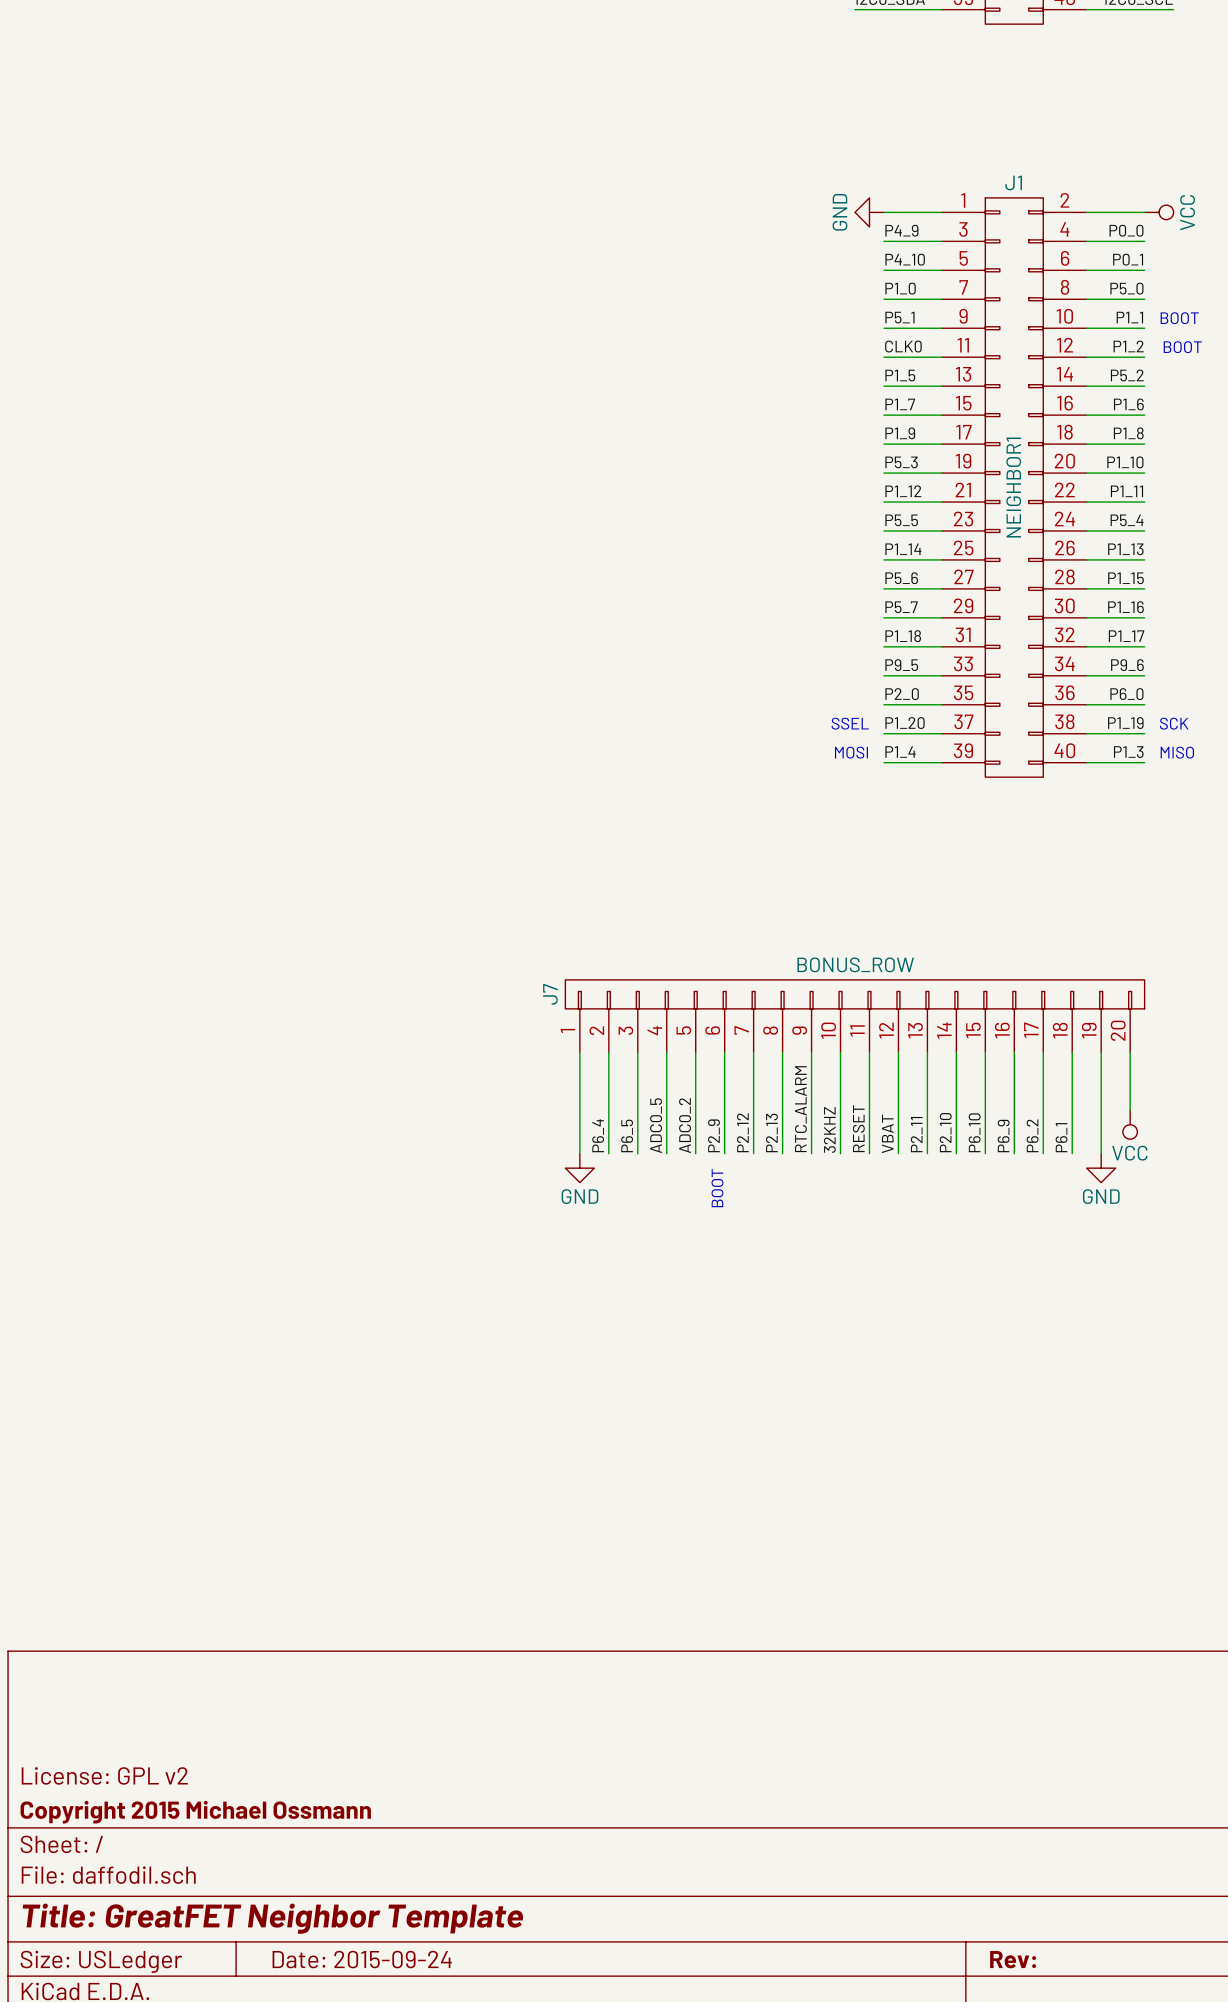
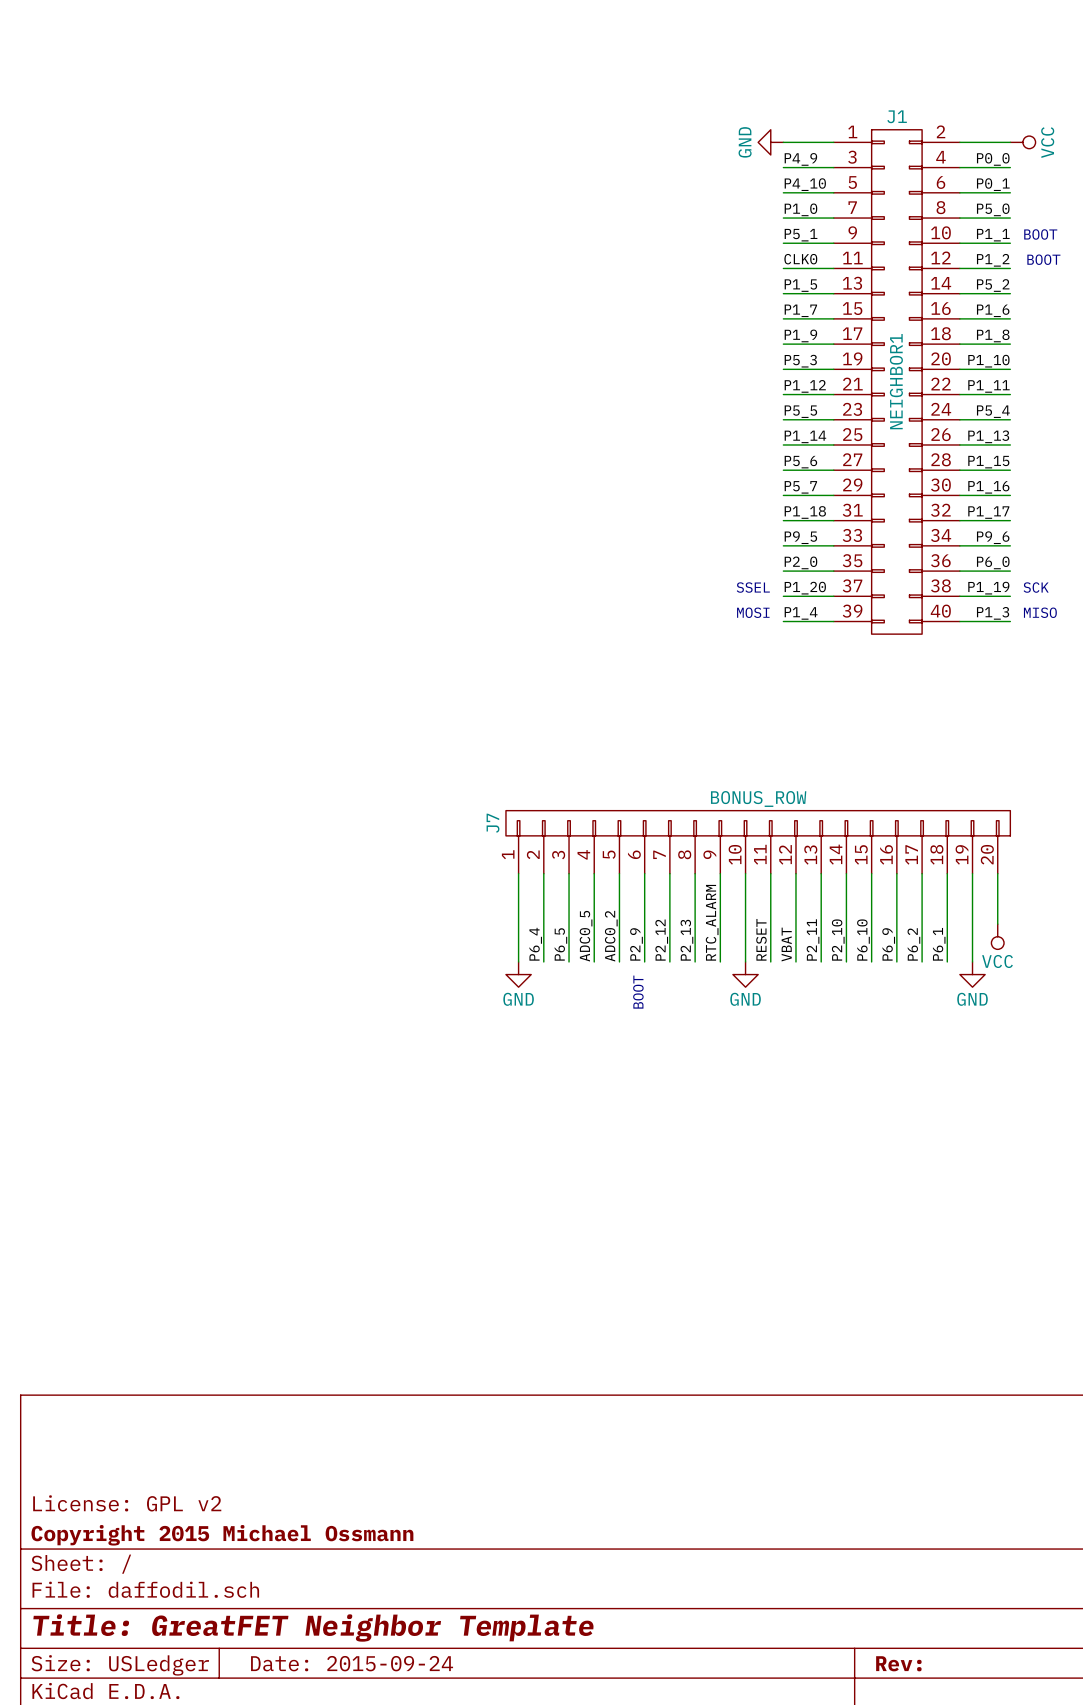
label: 32KHZ (829, 1129) -> none
power symbol: none -> GND (745, 974)

